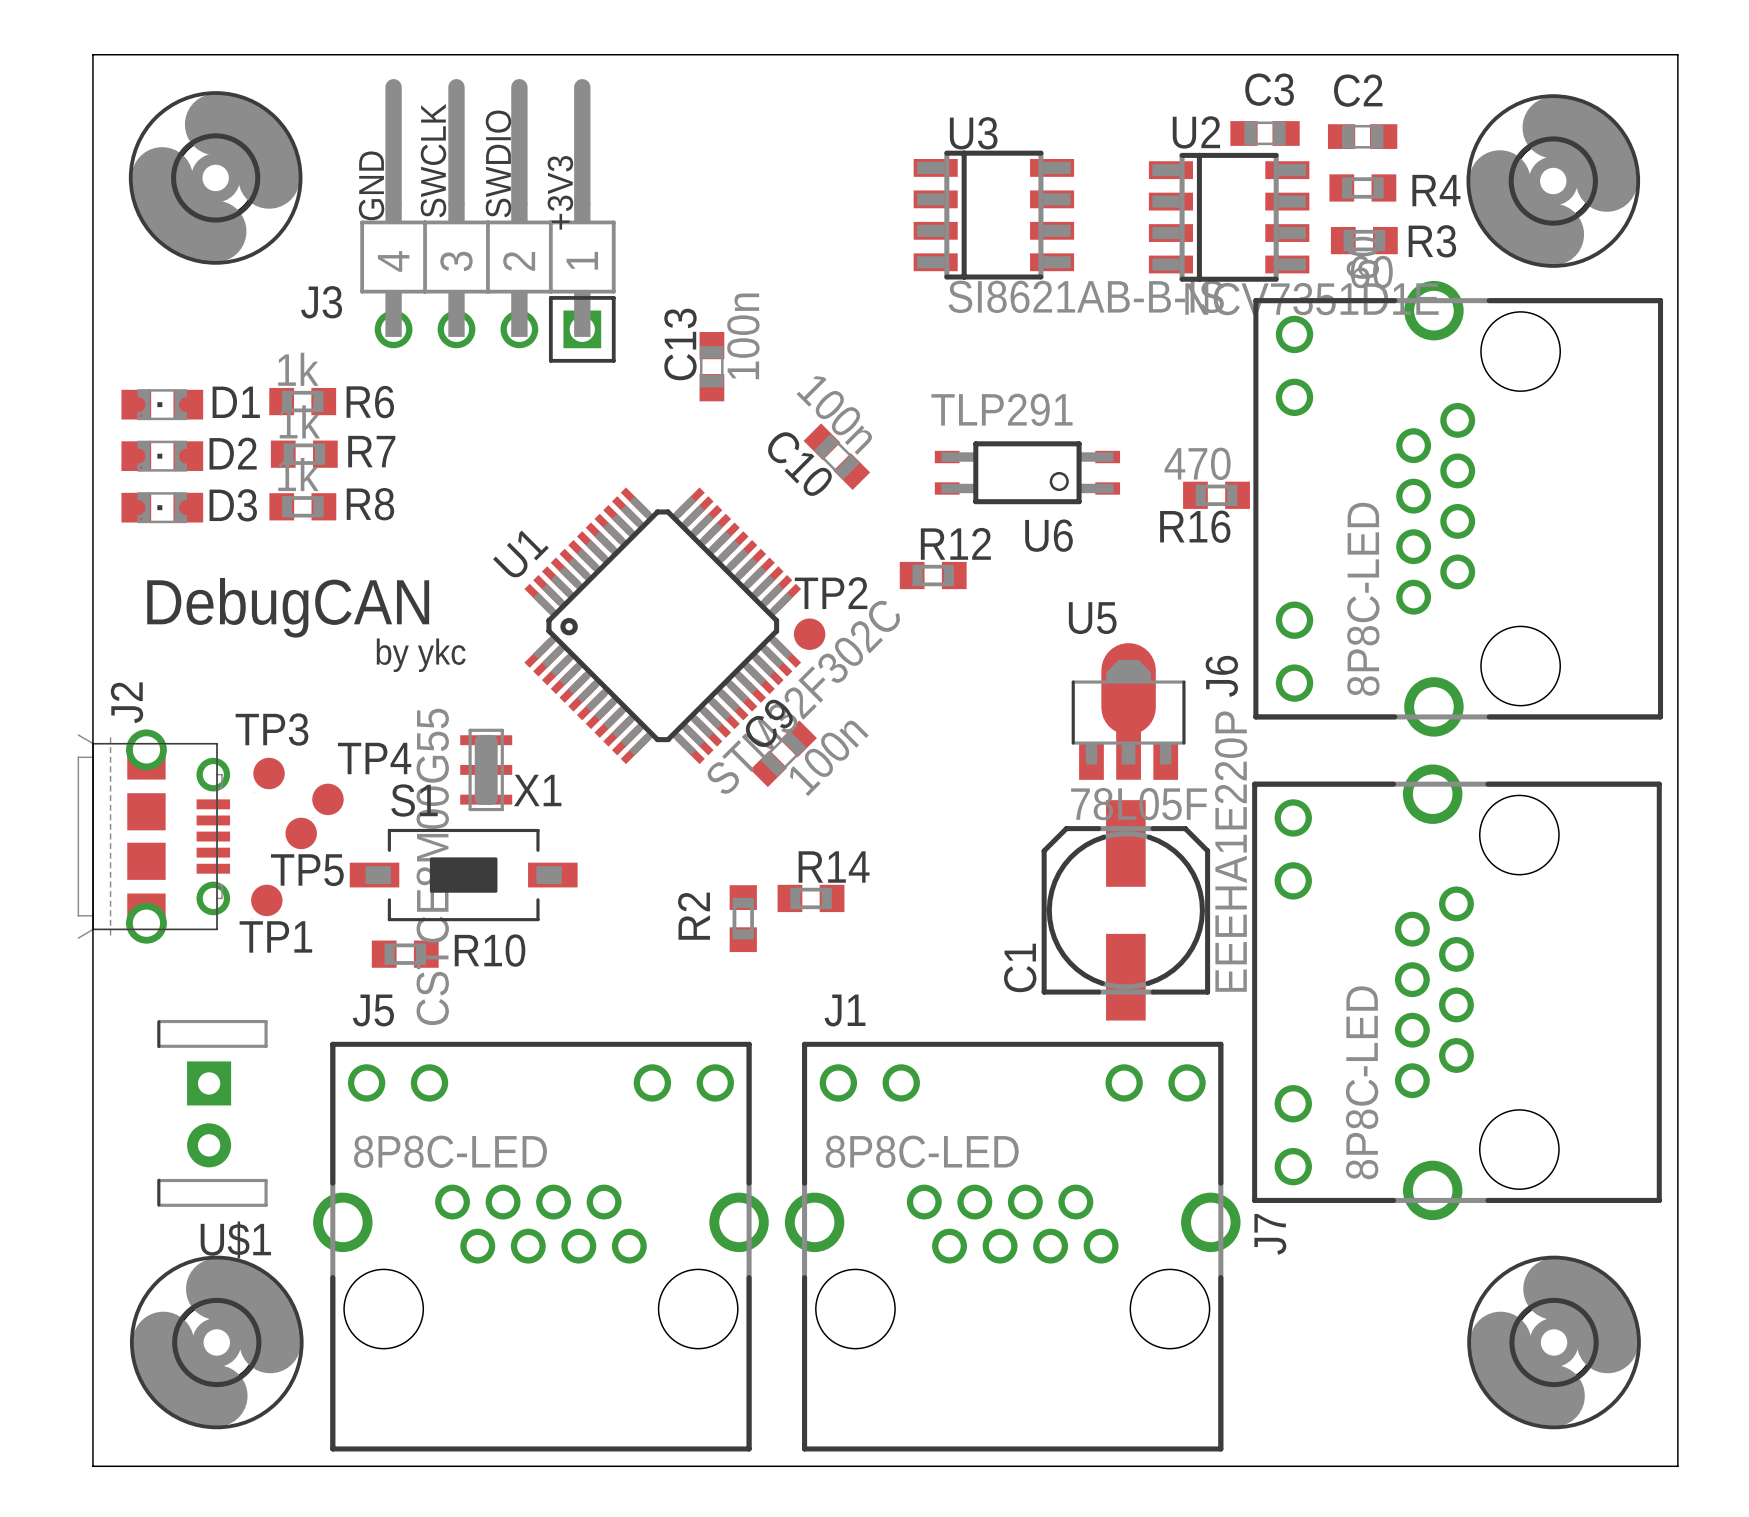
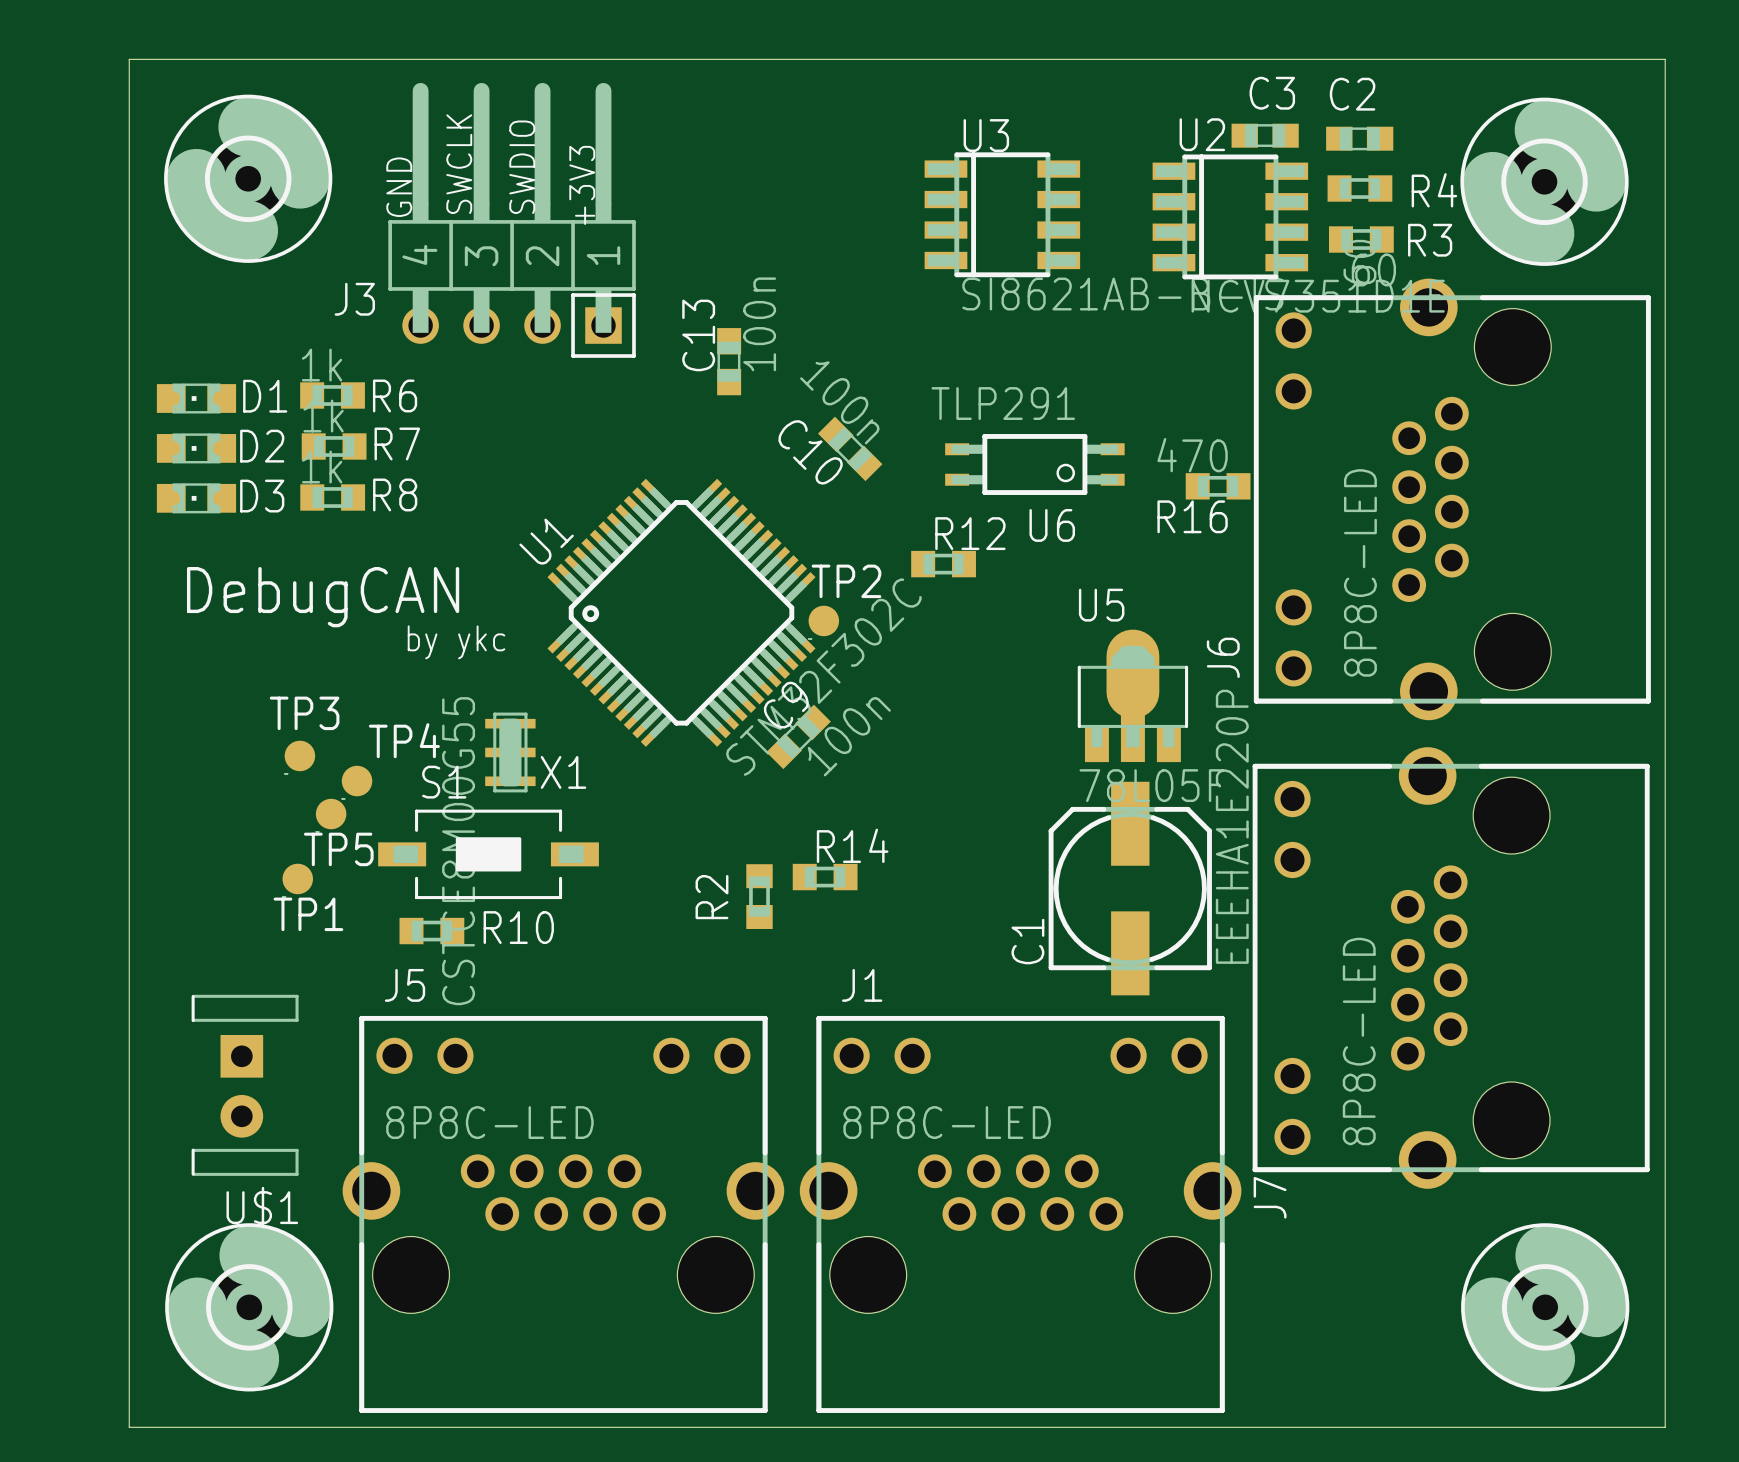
J2: (153, 836) -> none

